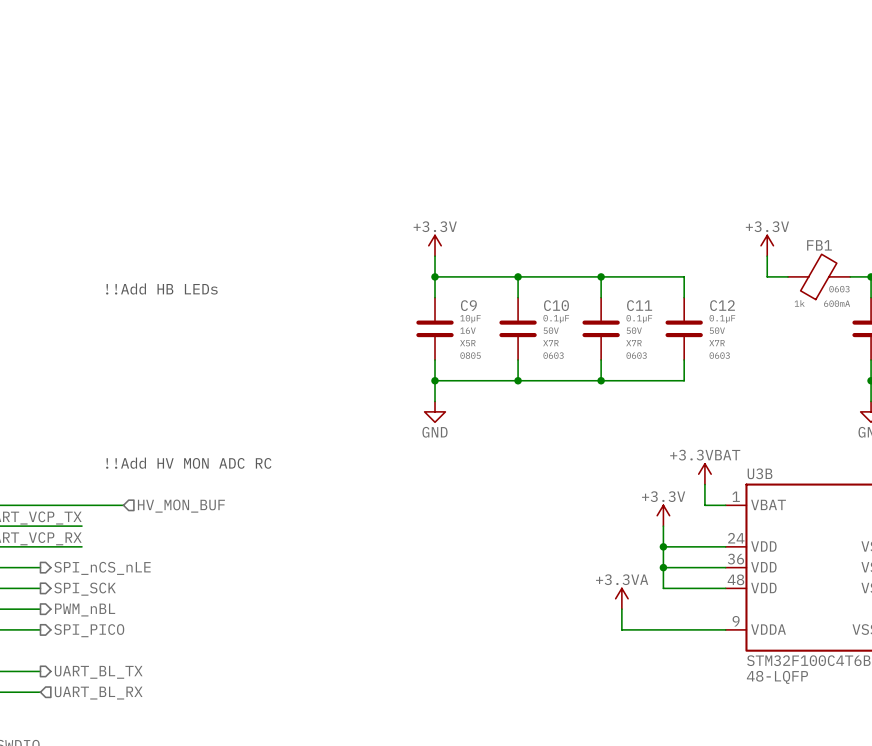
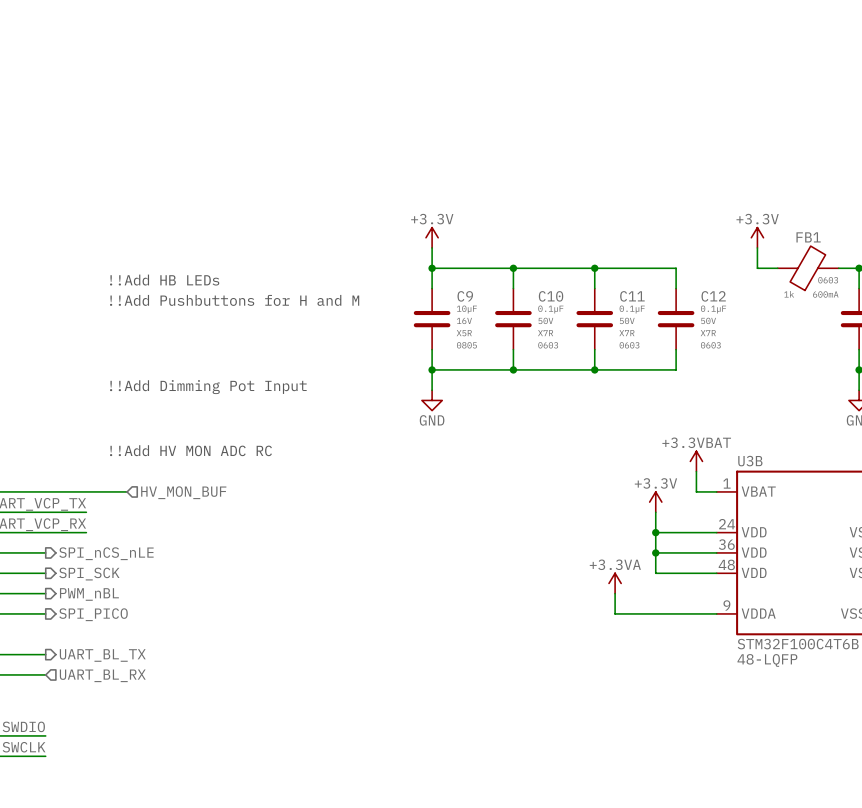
text: none -> !!Add Pushbuttons for H and M (234, 300)
text: none -> !!Add Dimming Pot Input (208, 387)

